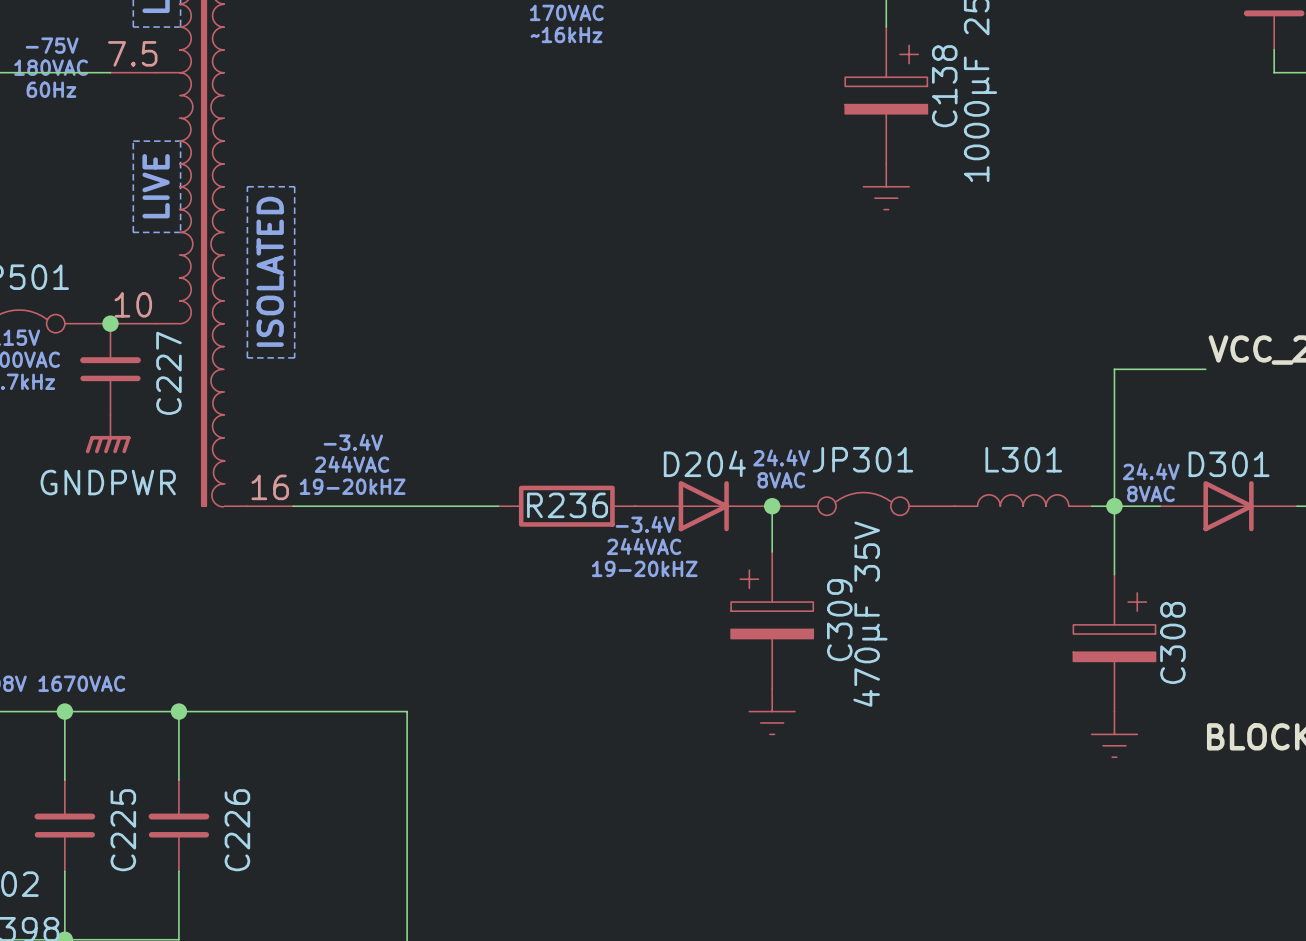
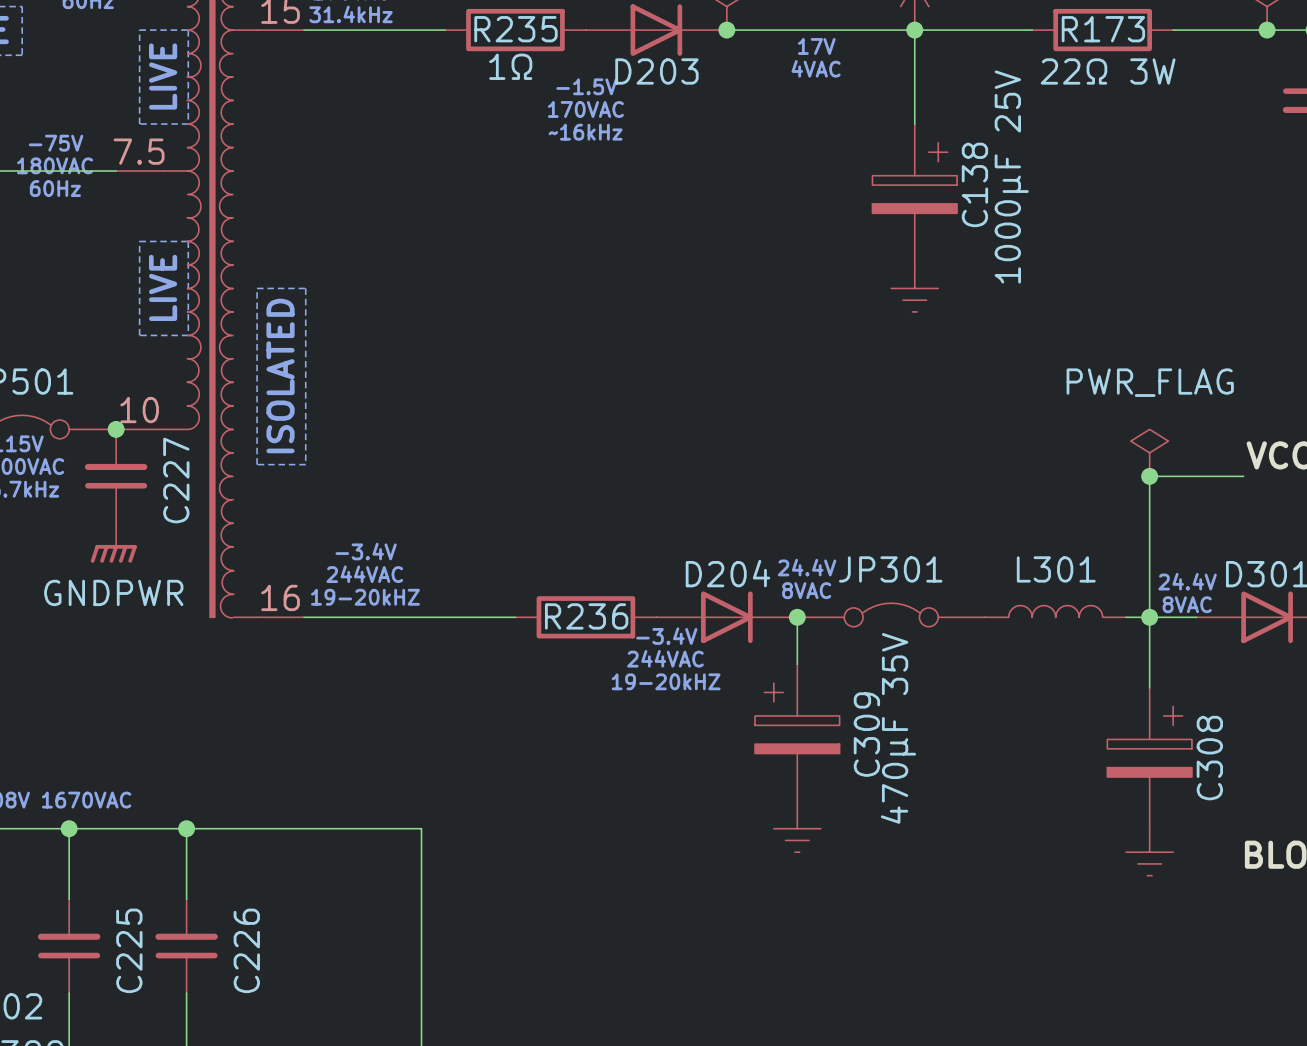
power symbol: none -> PWR_FLAG (1149, 452)
junction: none -> (1149, 476)

